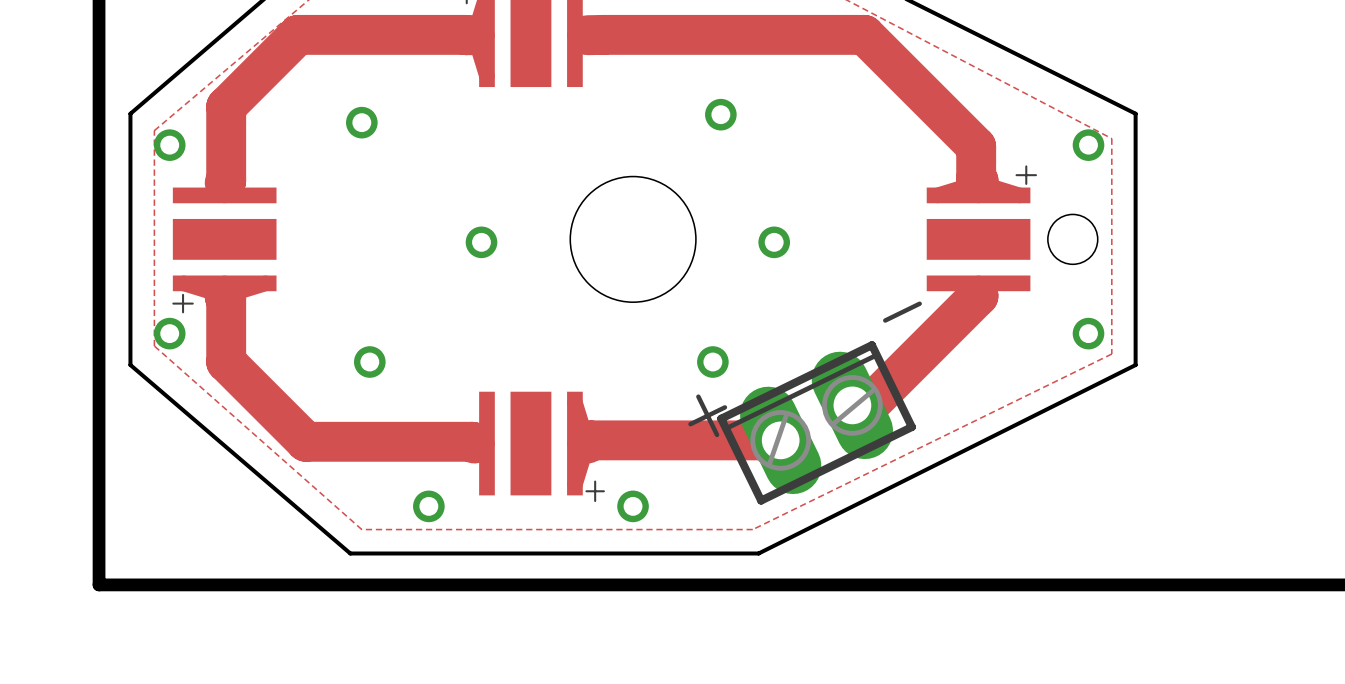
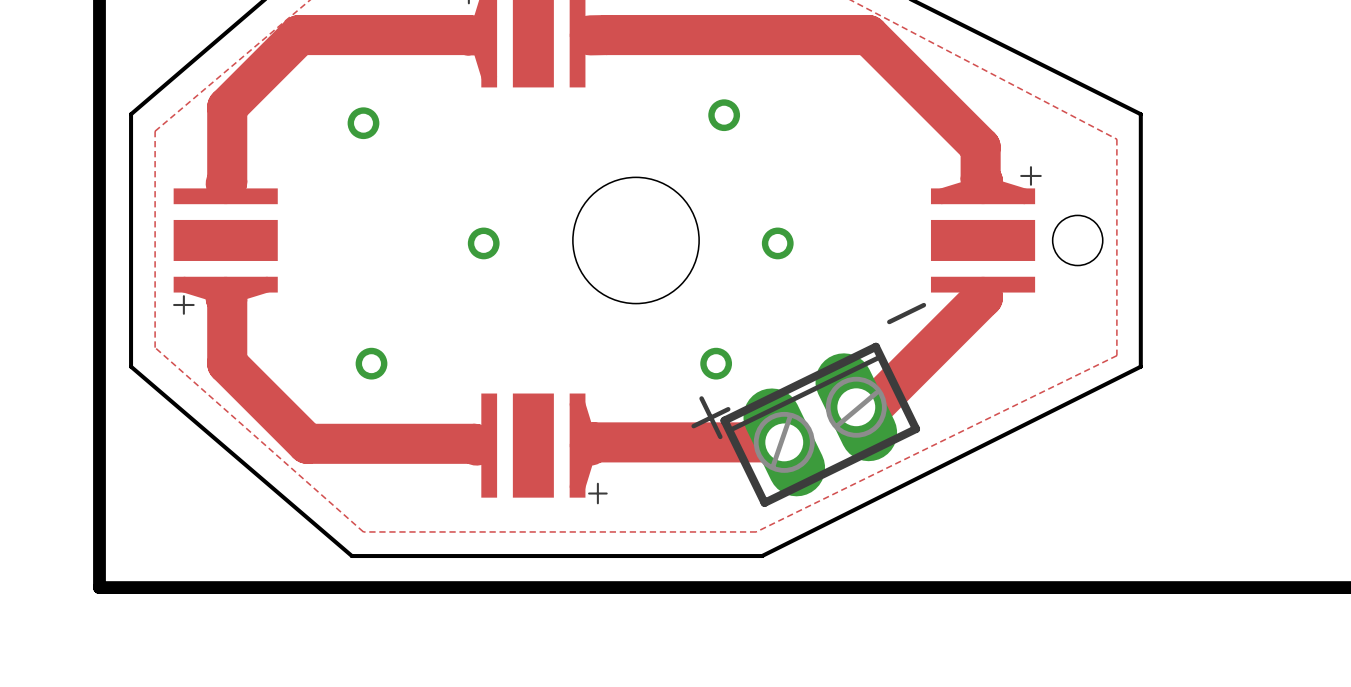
via: (169, 145) -> none
via: (1088, 145) -> none
via: (169, 333) -> none
via: (1088, 333) -> none
via: (428, 506) -> none
via: (633, 506) -> none

